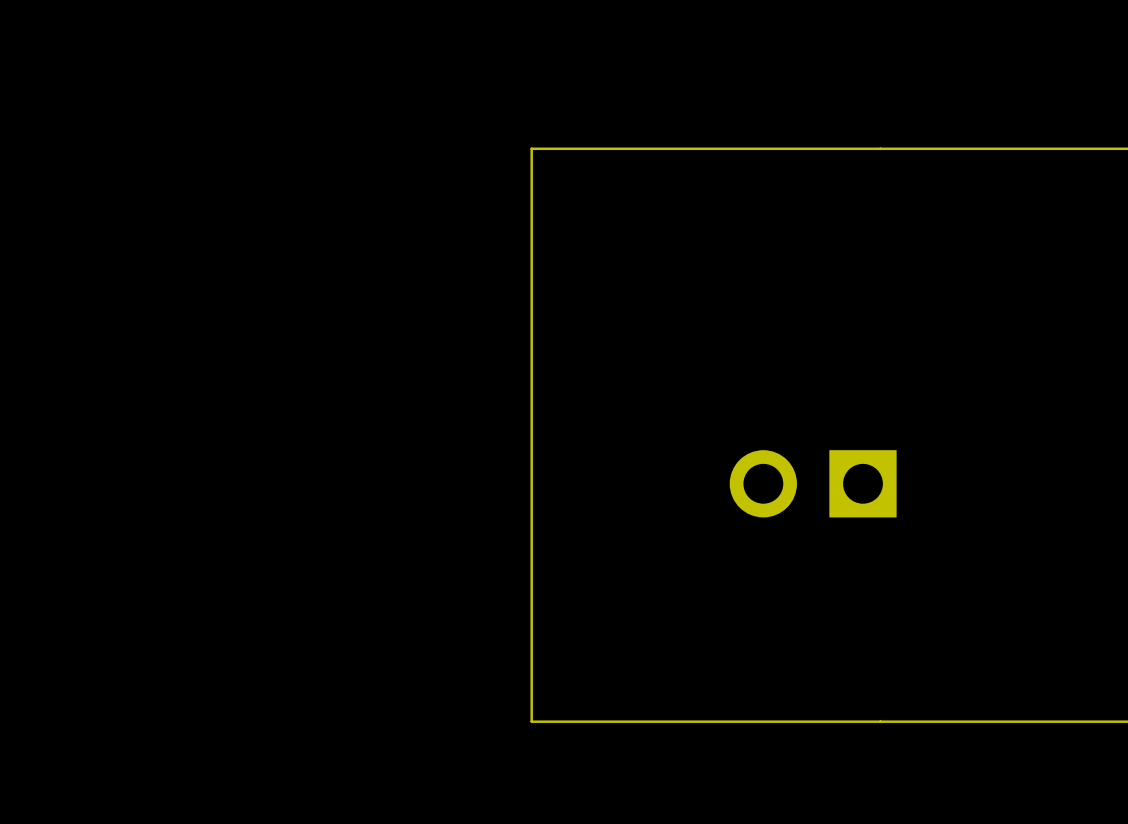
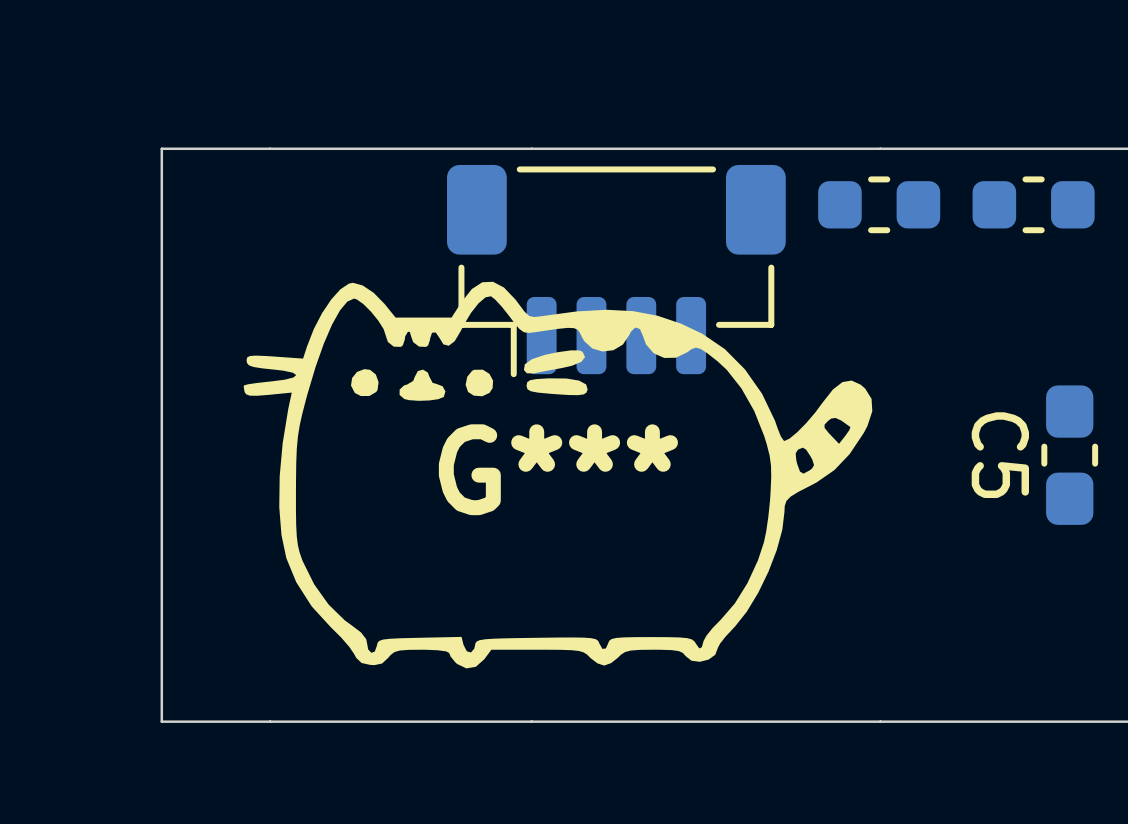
board edge: (531, 148) (531, 721) -> (531, 148) (161, 148) (161, 721) (531, 721)
part: none -> (879, 204)
part: none -> (1033, 204)
part: none -> (616, 271)
C5: none -> (1069, 455)
G***: none -> (557, 475)
part: (813, 483) -> none

